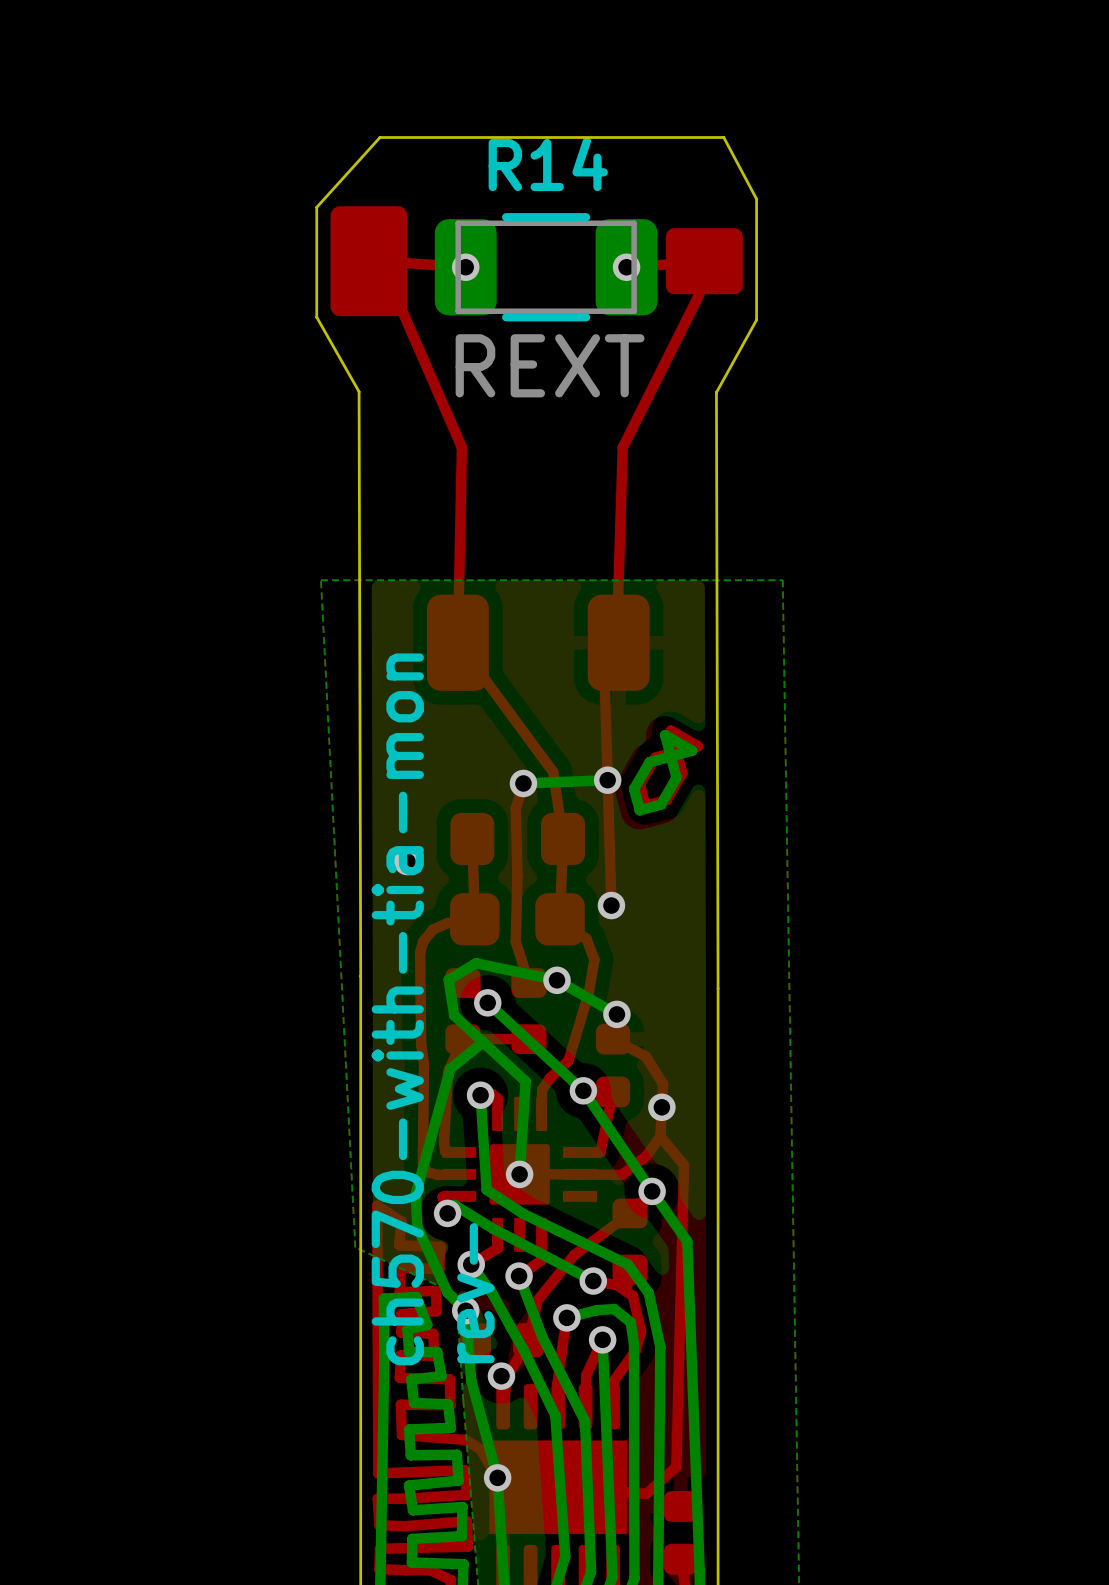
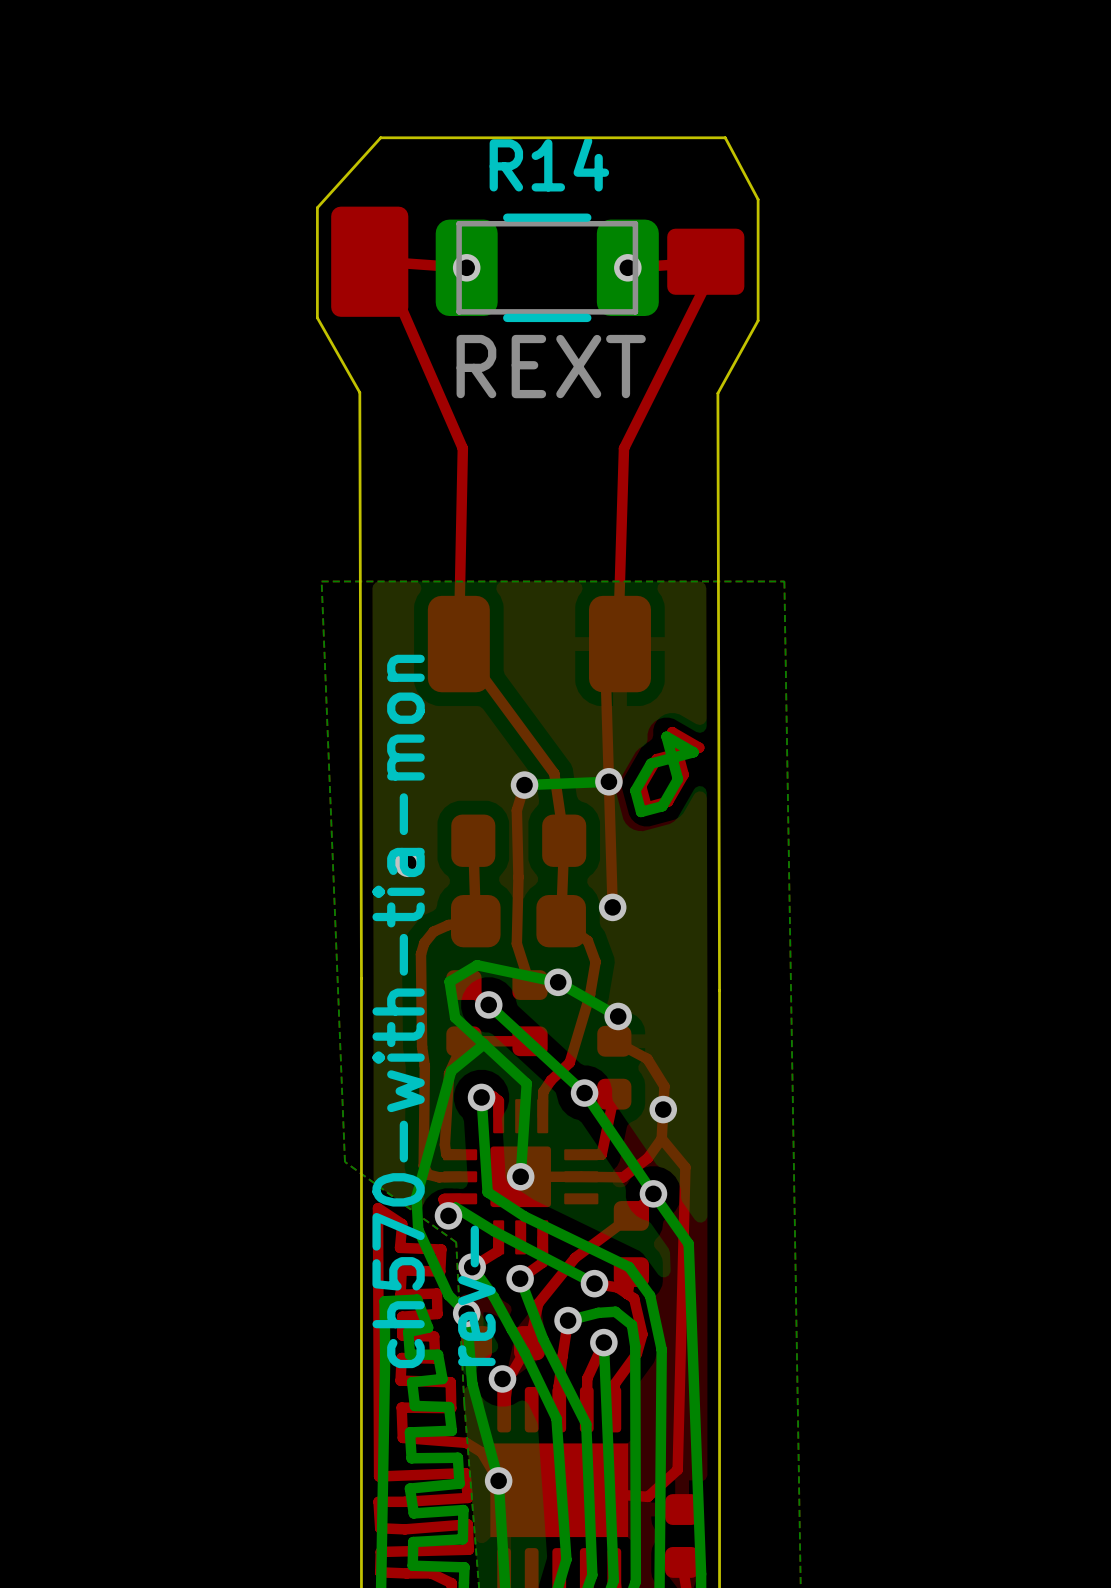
bottom zone outline: (320, 580) (355, 1247) (456, 1293) (463, 1401) -> (321, 581) (344, 1161) (456, 1242) (464, 1403)

